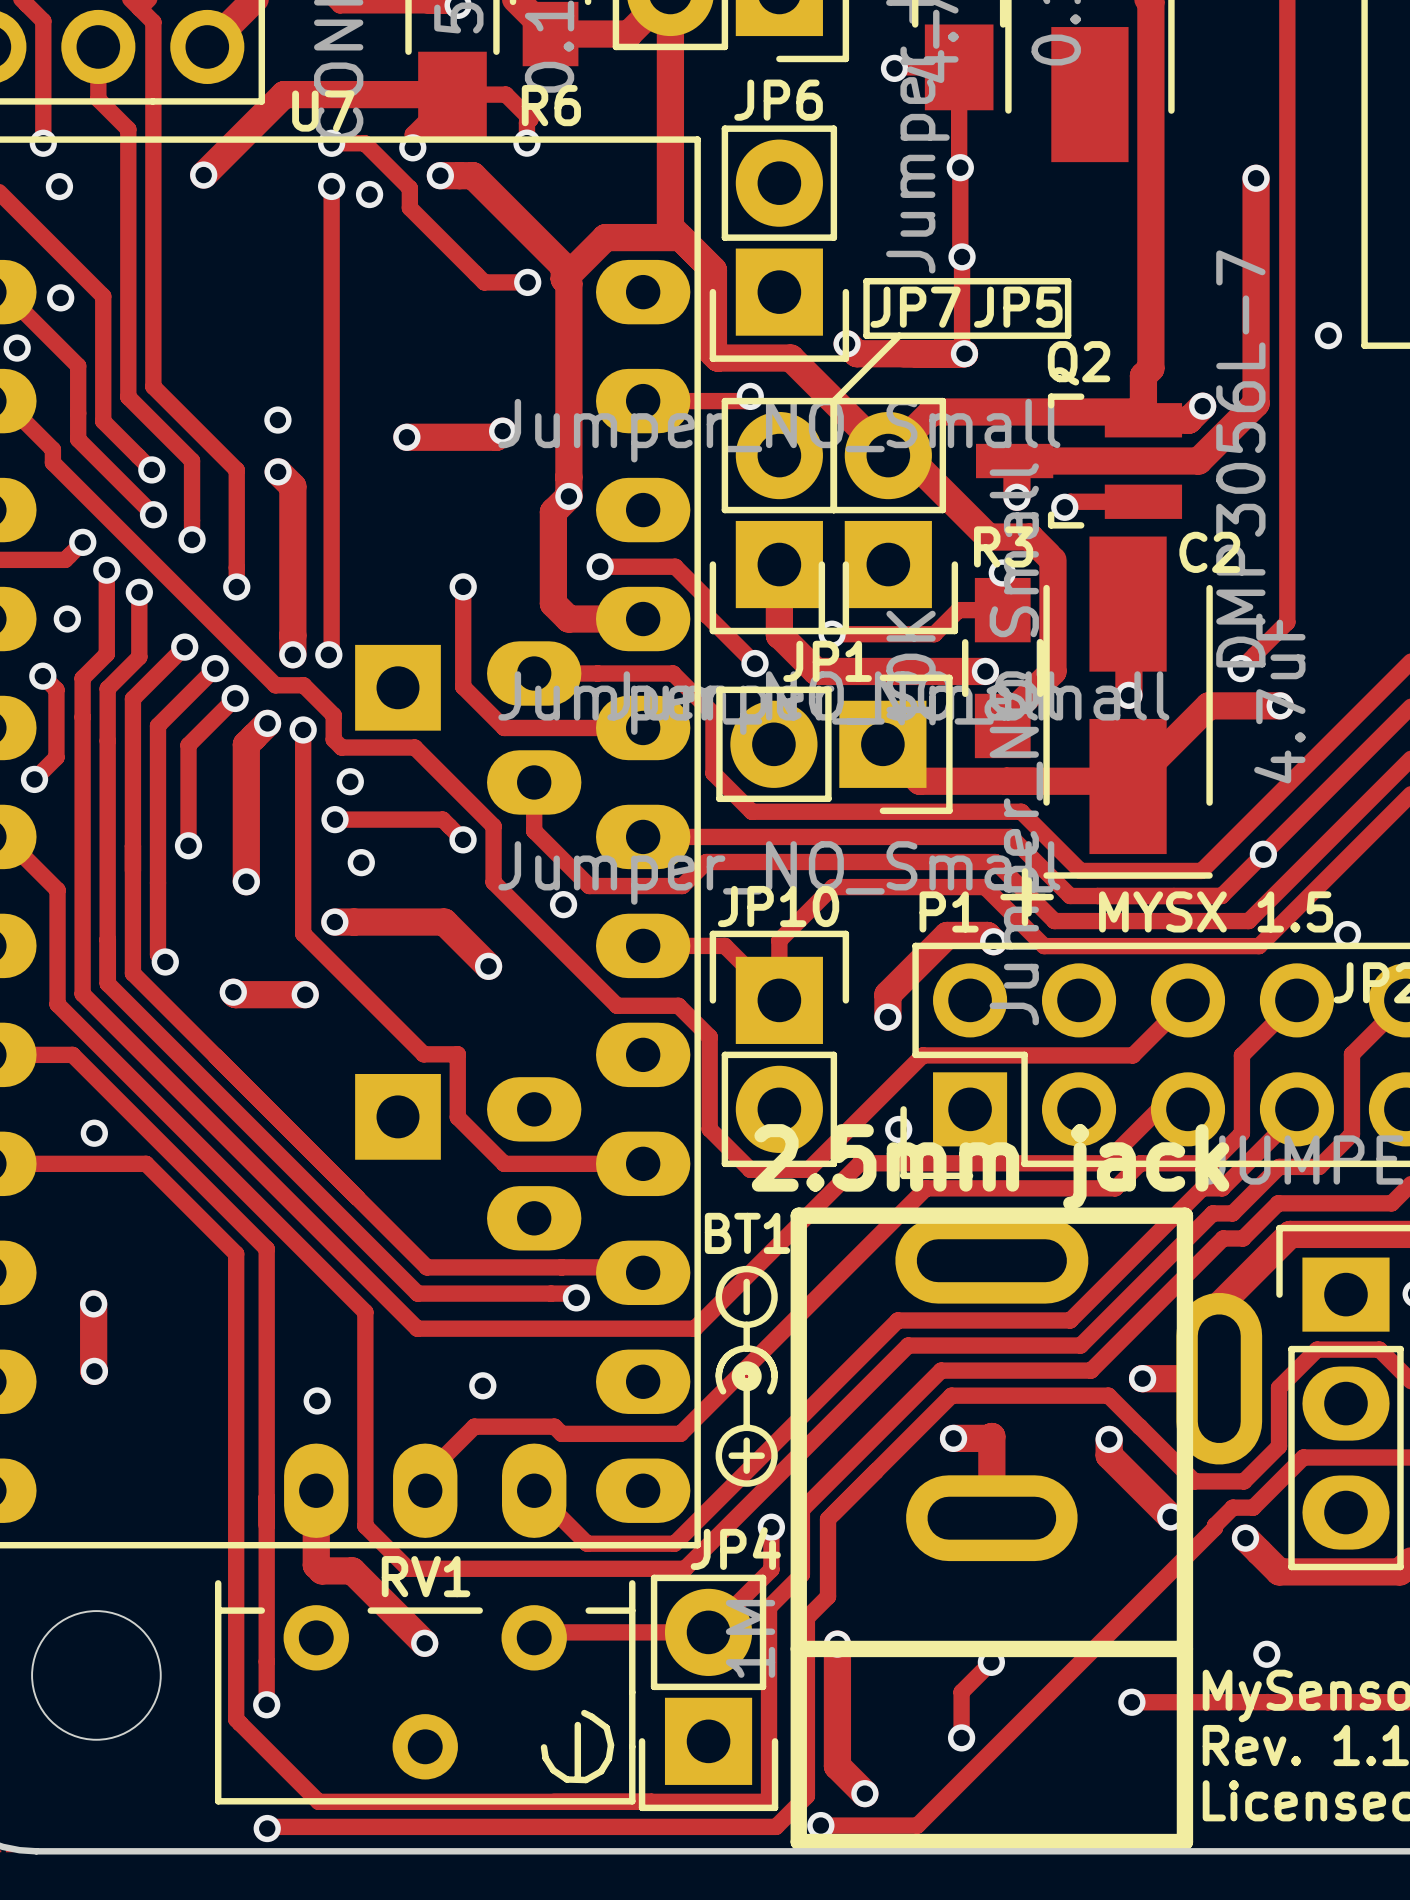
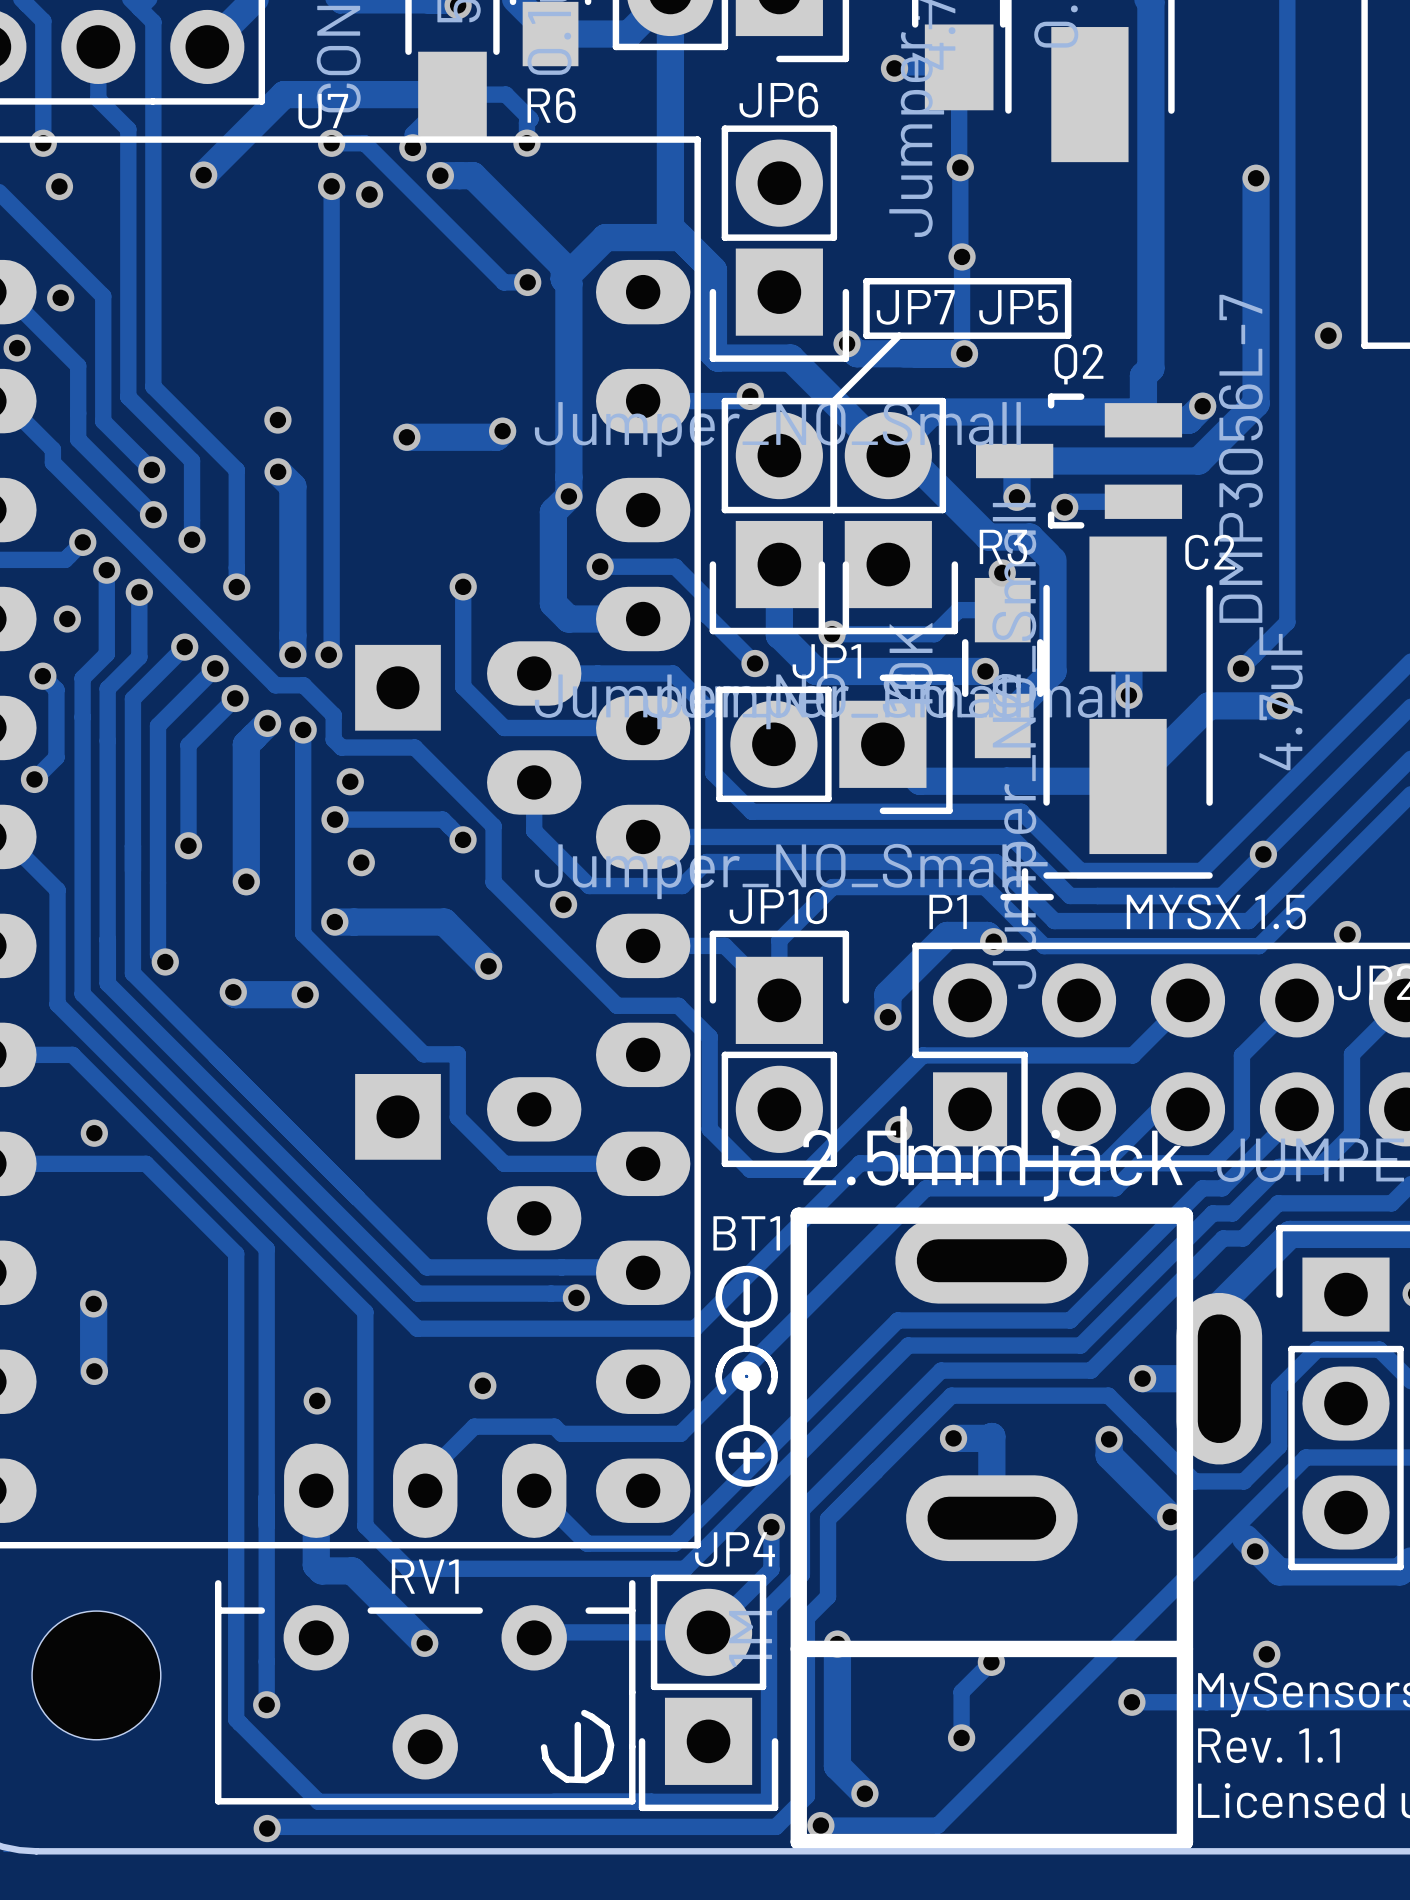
track: (409, 188) (409, 207) (484, 282) (503, 282) -> (409, 188) (503, 282)
track: (1305, 1457) (1303, 1457) (1253, 1507) (1232, 1507) (1214, 1525) (1214, 1528) (917, 1825) -> (1305, 1457) (937, 1825) (917, 1825)
via position: (1245, 1538) -> (1255, 1551)

